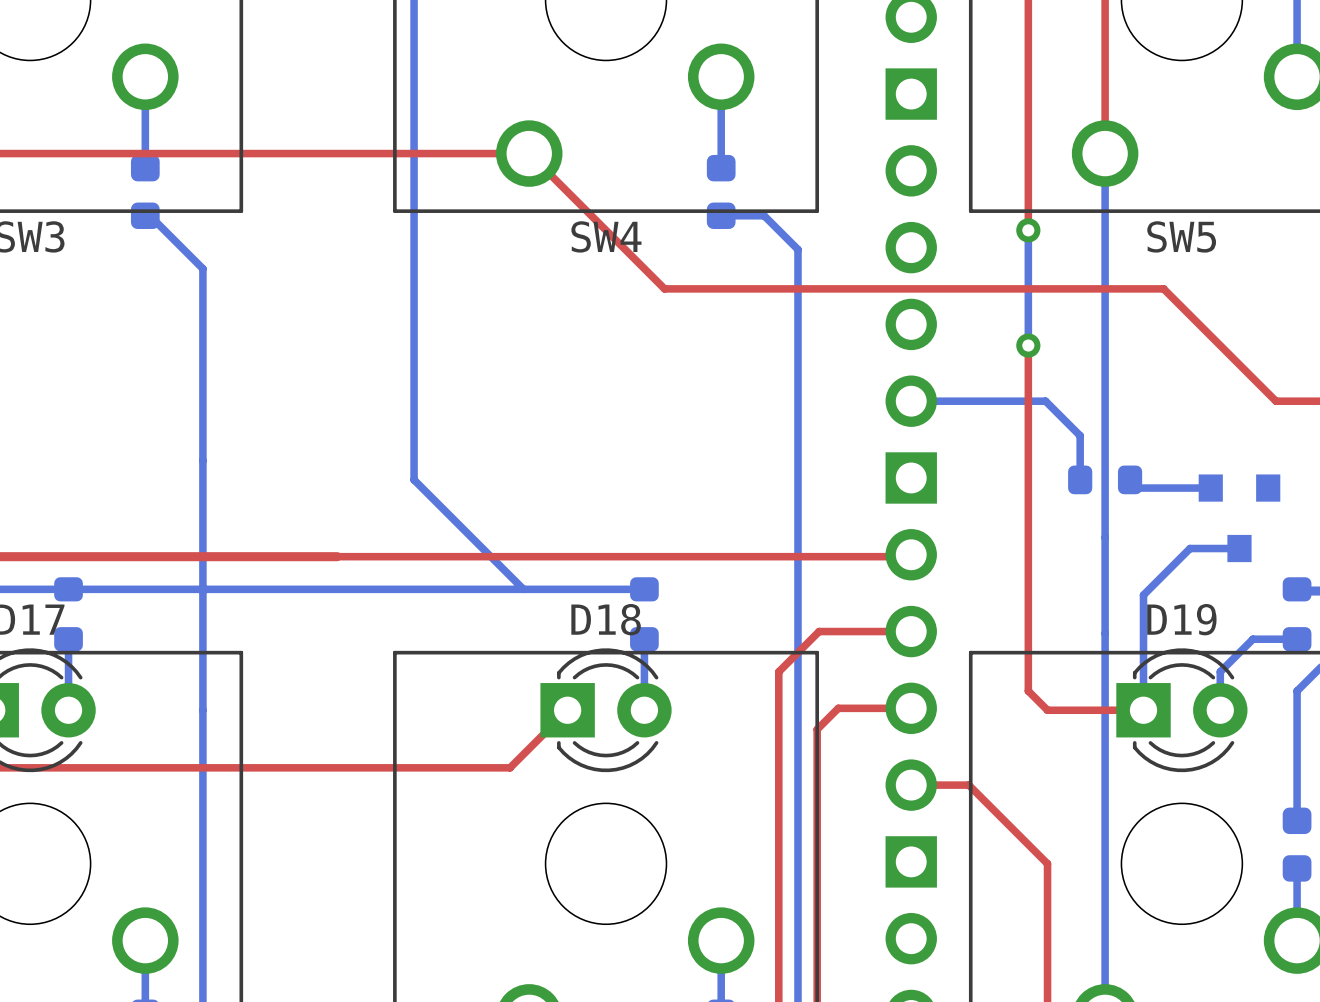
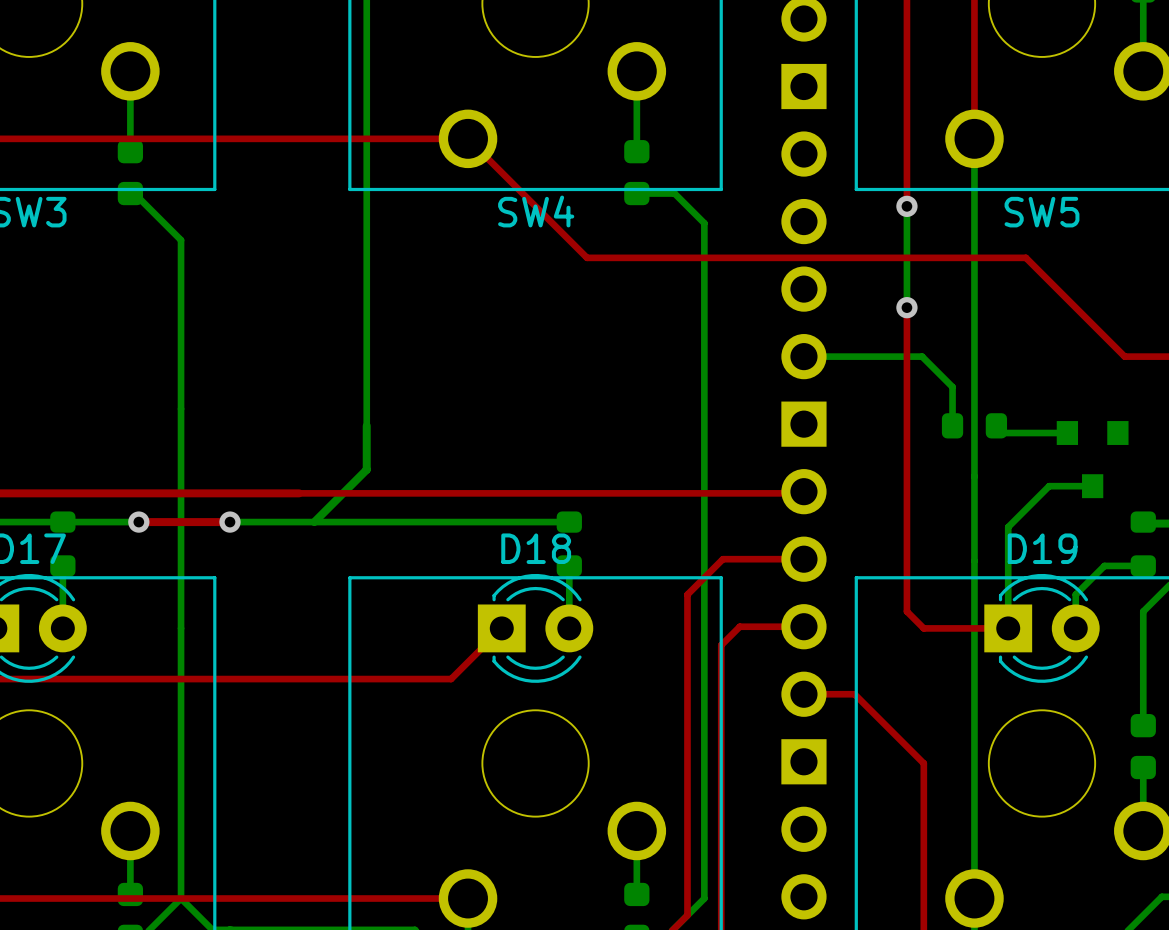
bottom track: (414, 479) (523, 589) -> (366, 425) (366, 469) (314, 522)
bottom track: (154, 589) (258, 589) -> none
top track: none -> (138, 522) (230, 522)
via: none -> (138, 522)
via: none -> (230, 522)

